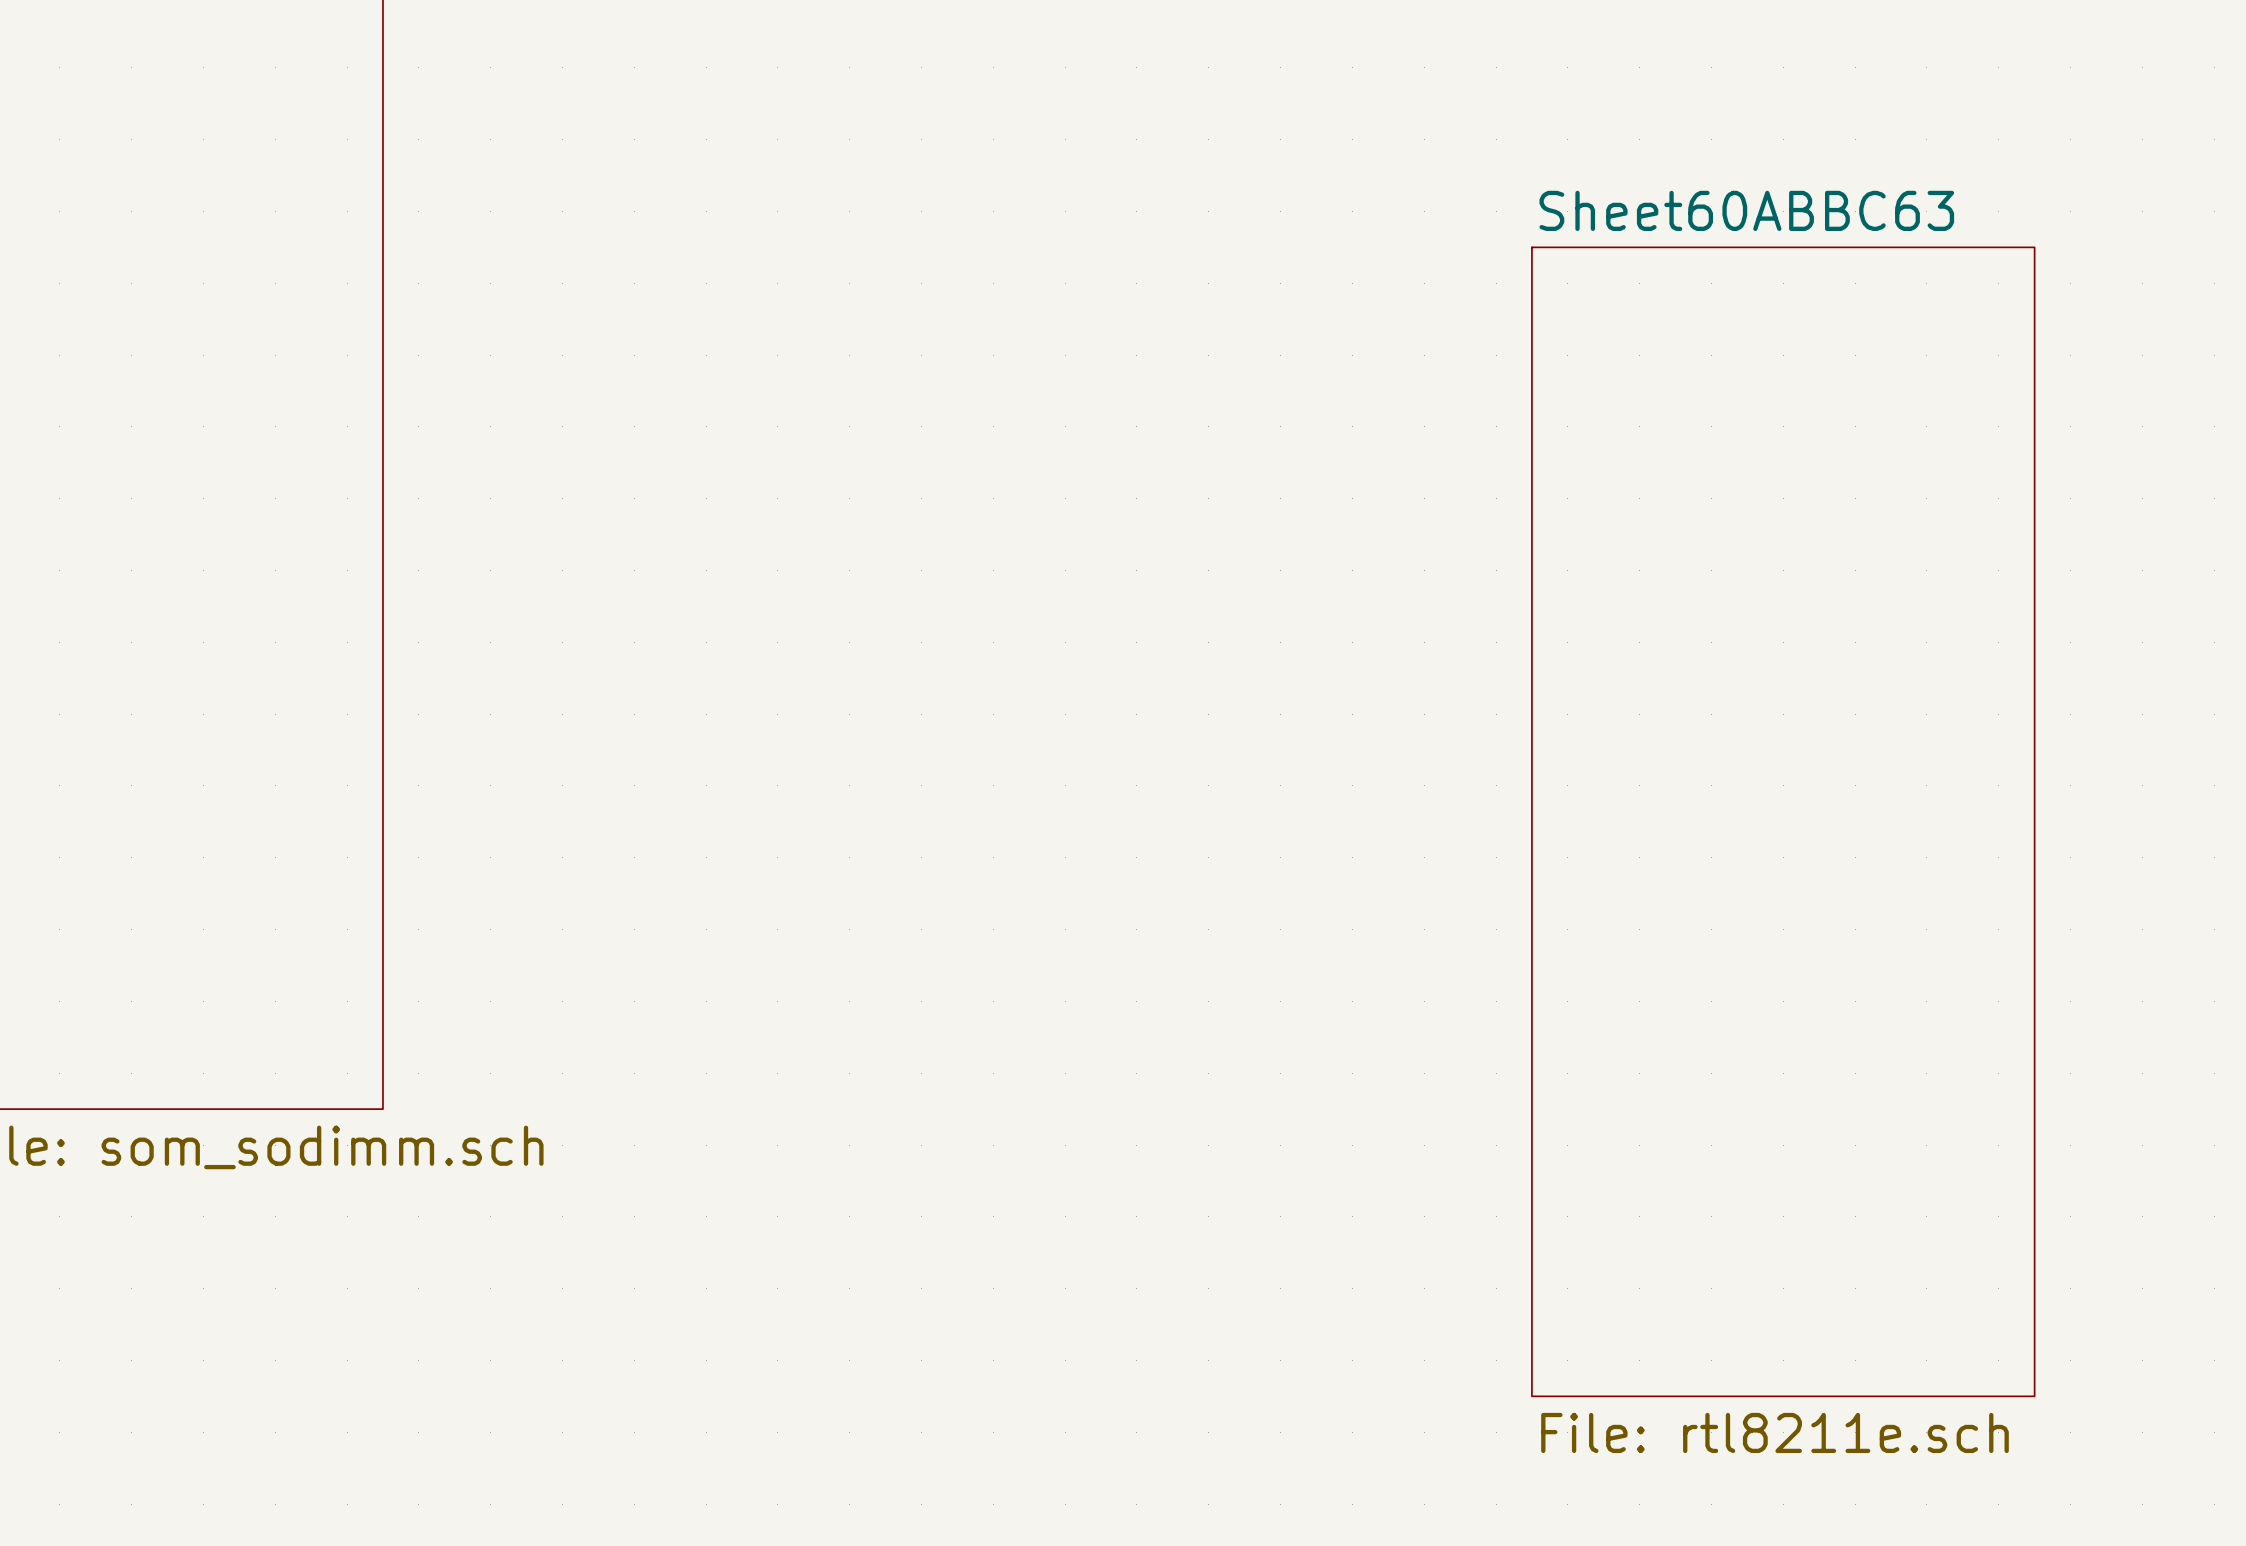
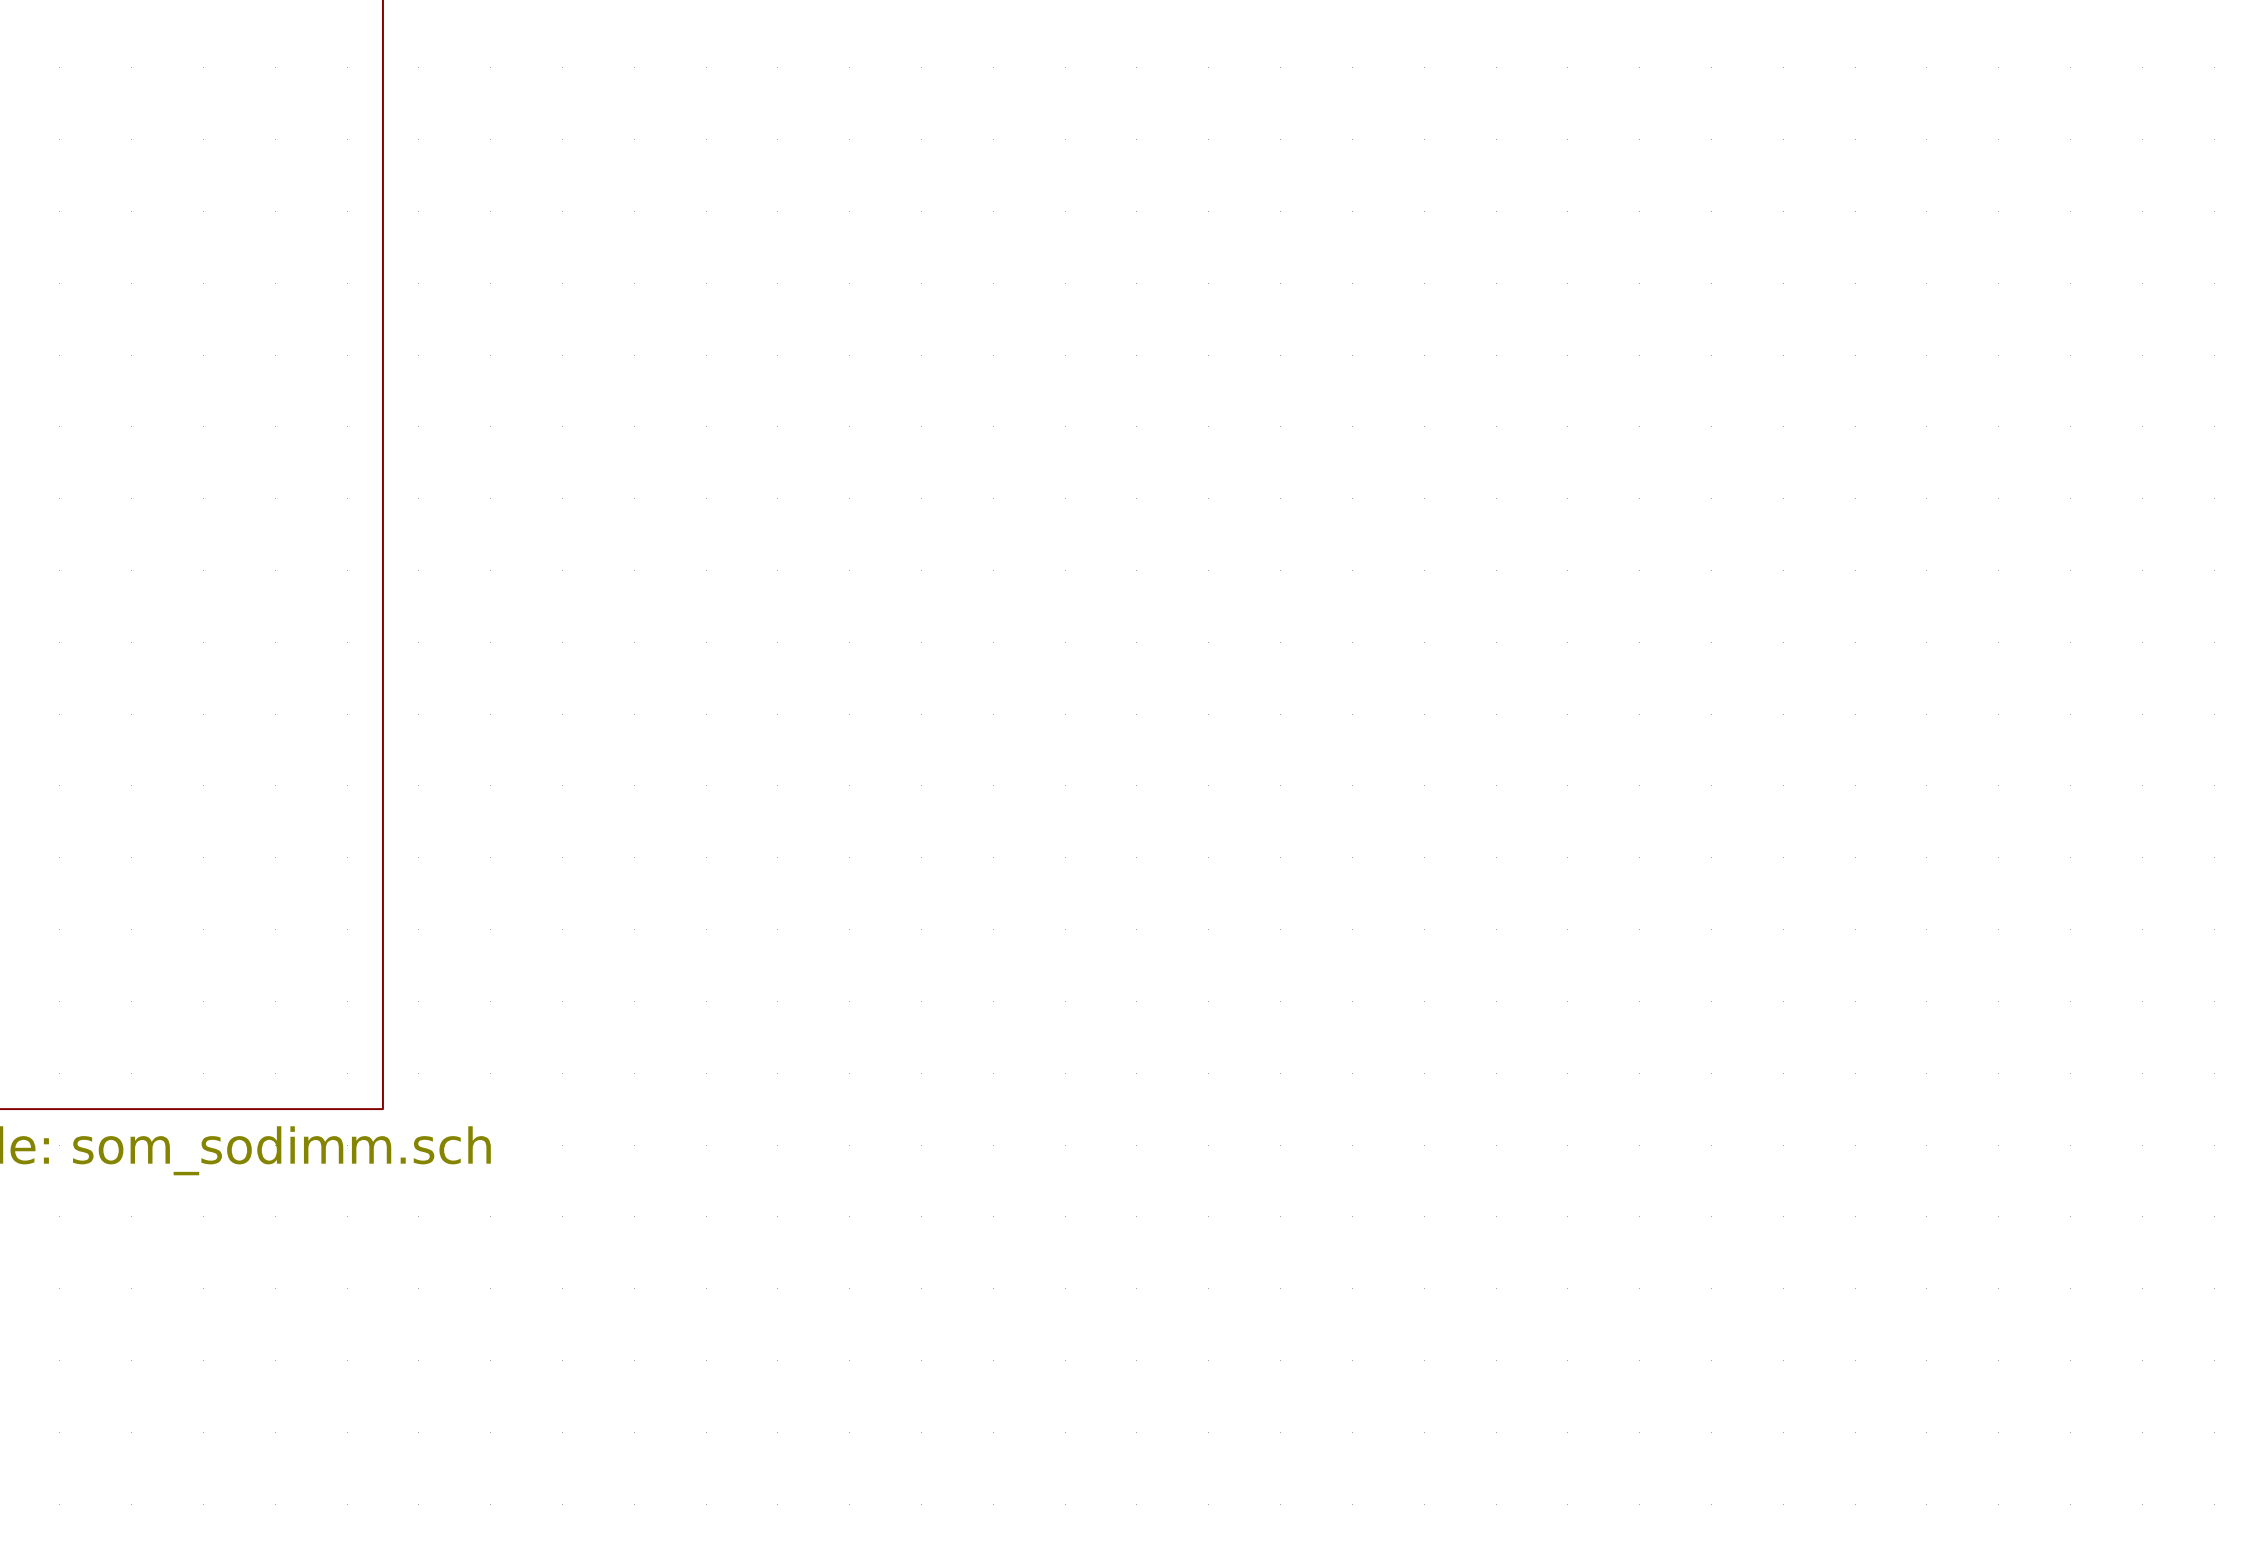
sheet Sheet60ABBC63: File: rtl8211e.sch (1783, 821) -> none

